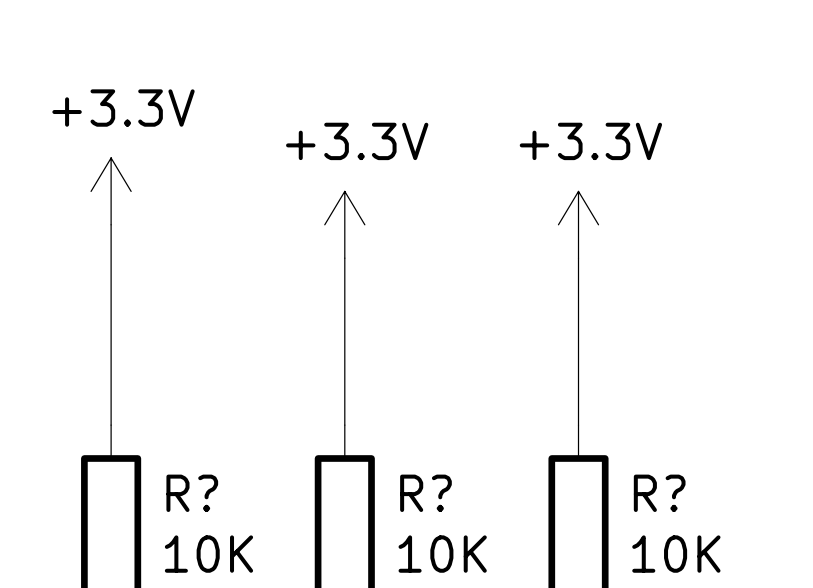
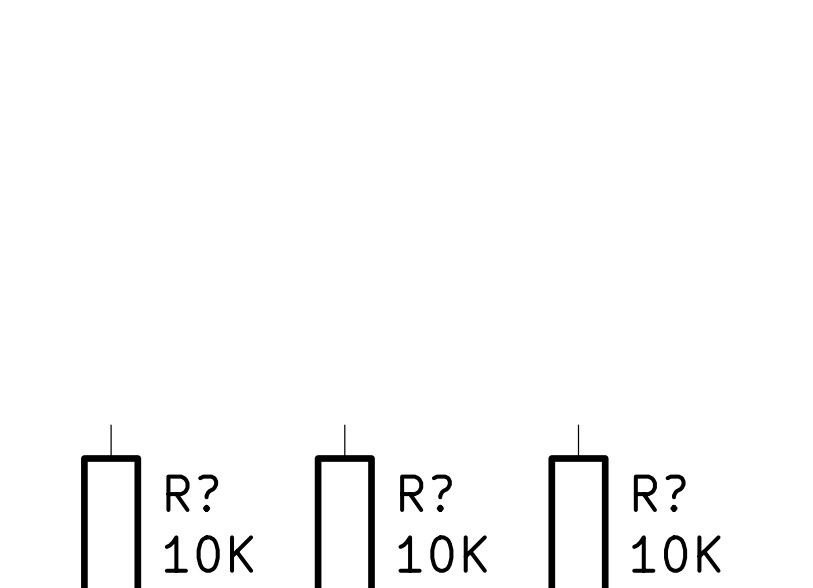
power symbol: +3.3V (111, 191) -> none
wire: (111, 224) (111, 425) -> none
power symbol: +3.3V (344, 224) -> none
power symbol: +3.3V (578, 224) -> none
wire: (344, 258) (344, 425) -> none
wire: (578, 258) (578, 425) -> none

